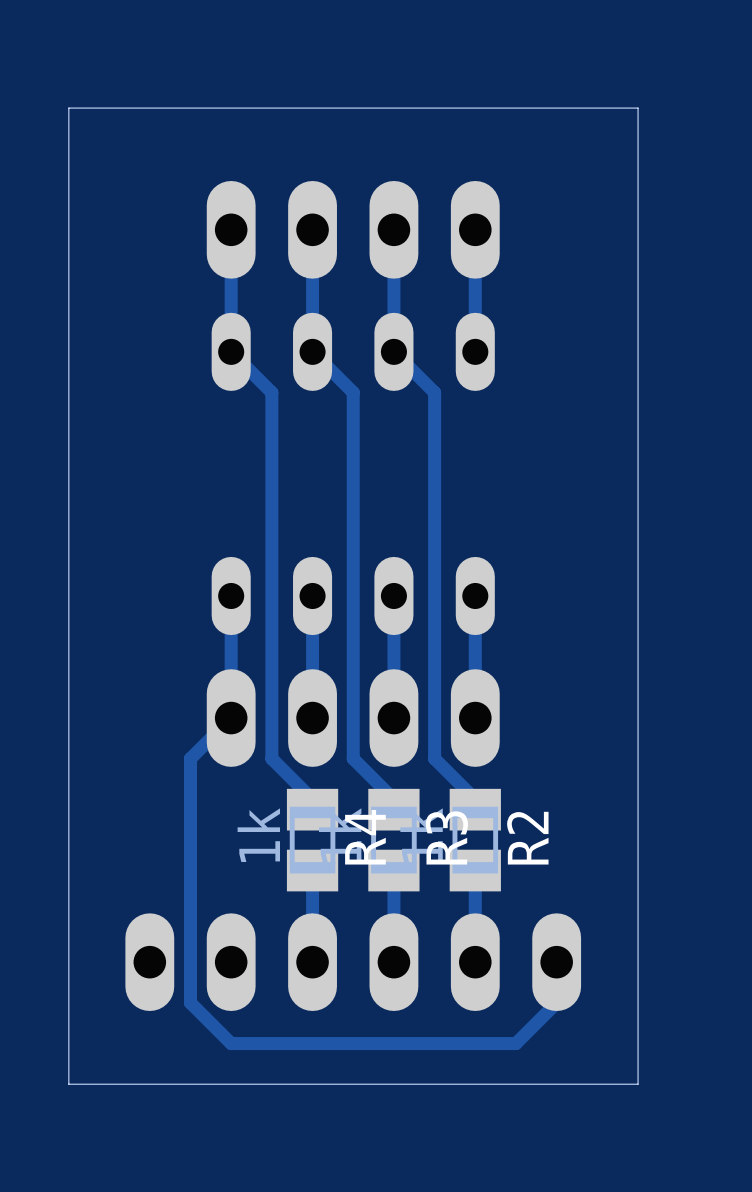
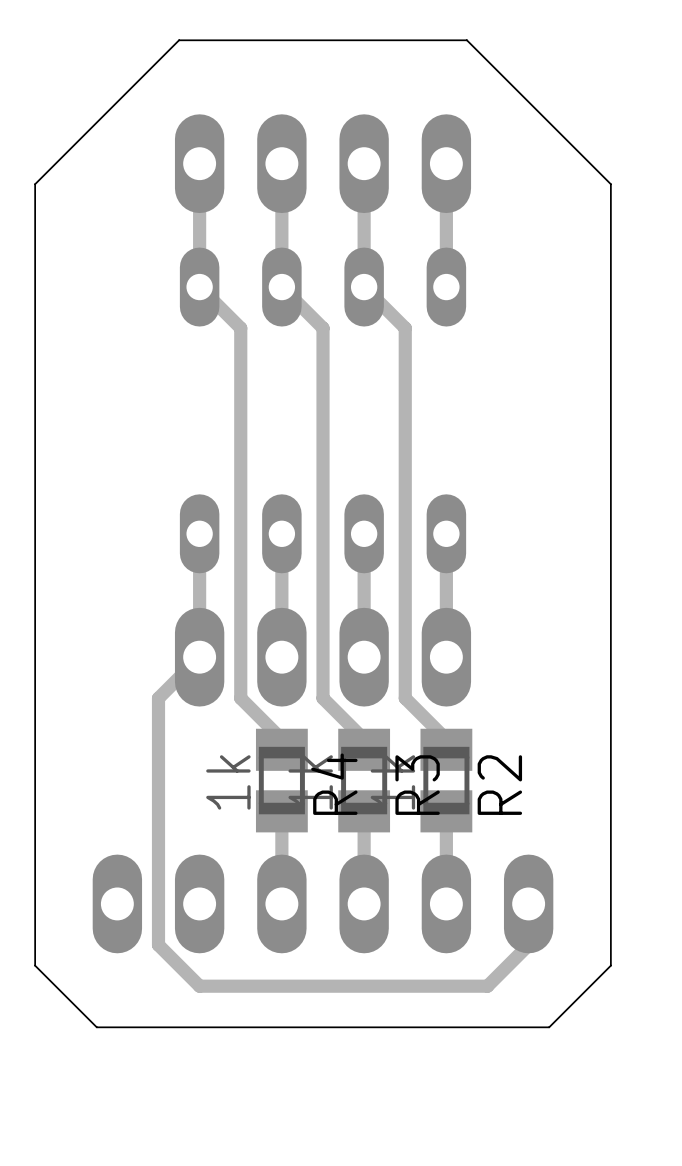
board edge: (638, 250) (638, 108) (68, 108) (68, 1084) (129, 1084) -> (610, 184) (466, 40) (179, 40) (35, 184) (35, 965) (96, 1027)
board edge: (638, 1023) (638, 1084) (577, 1084) -> (610, 965) (549, 1027)

